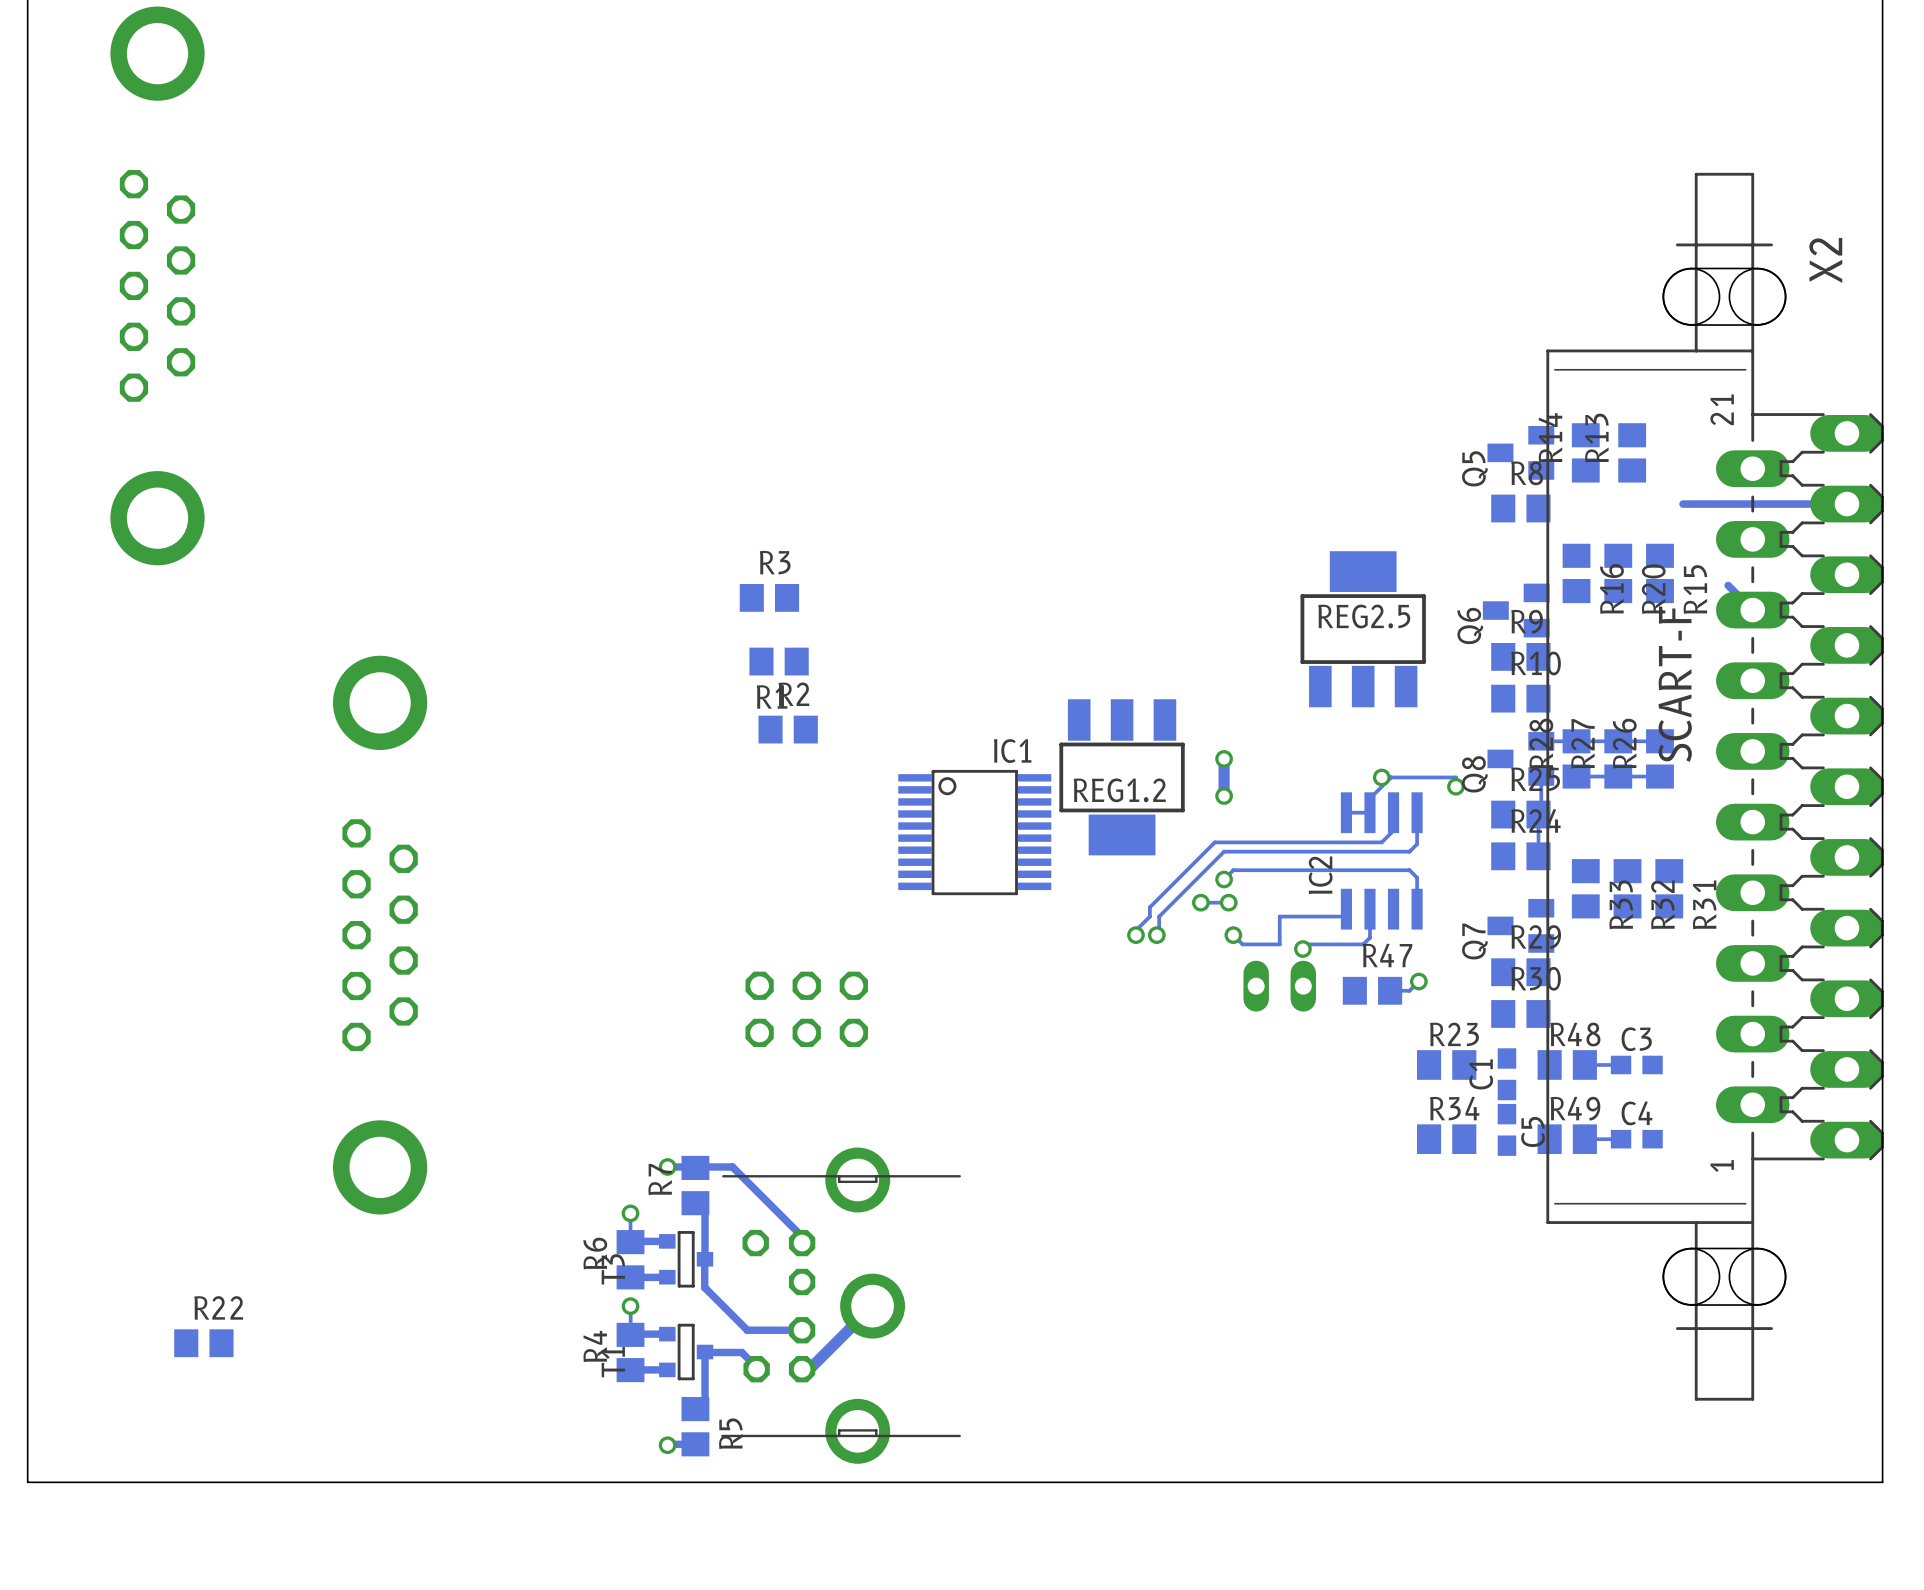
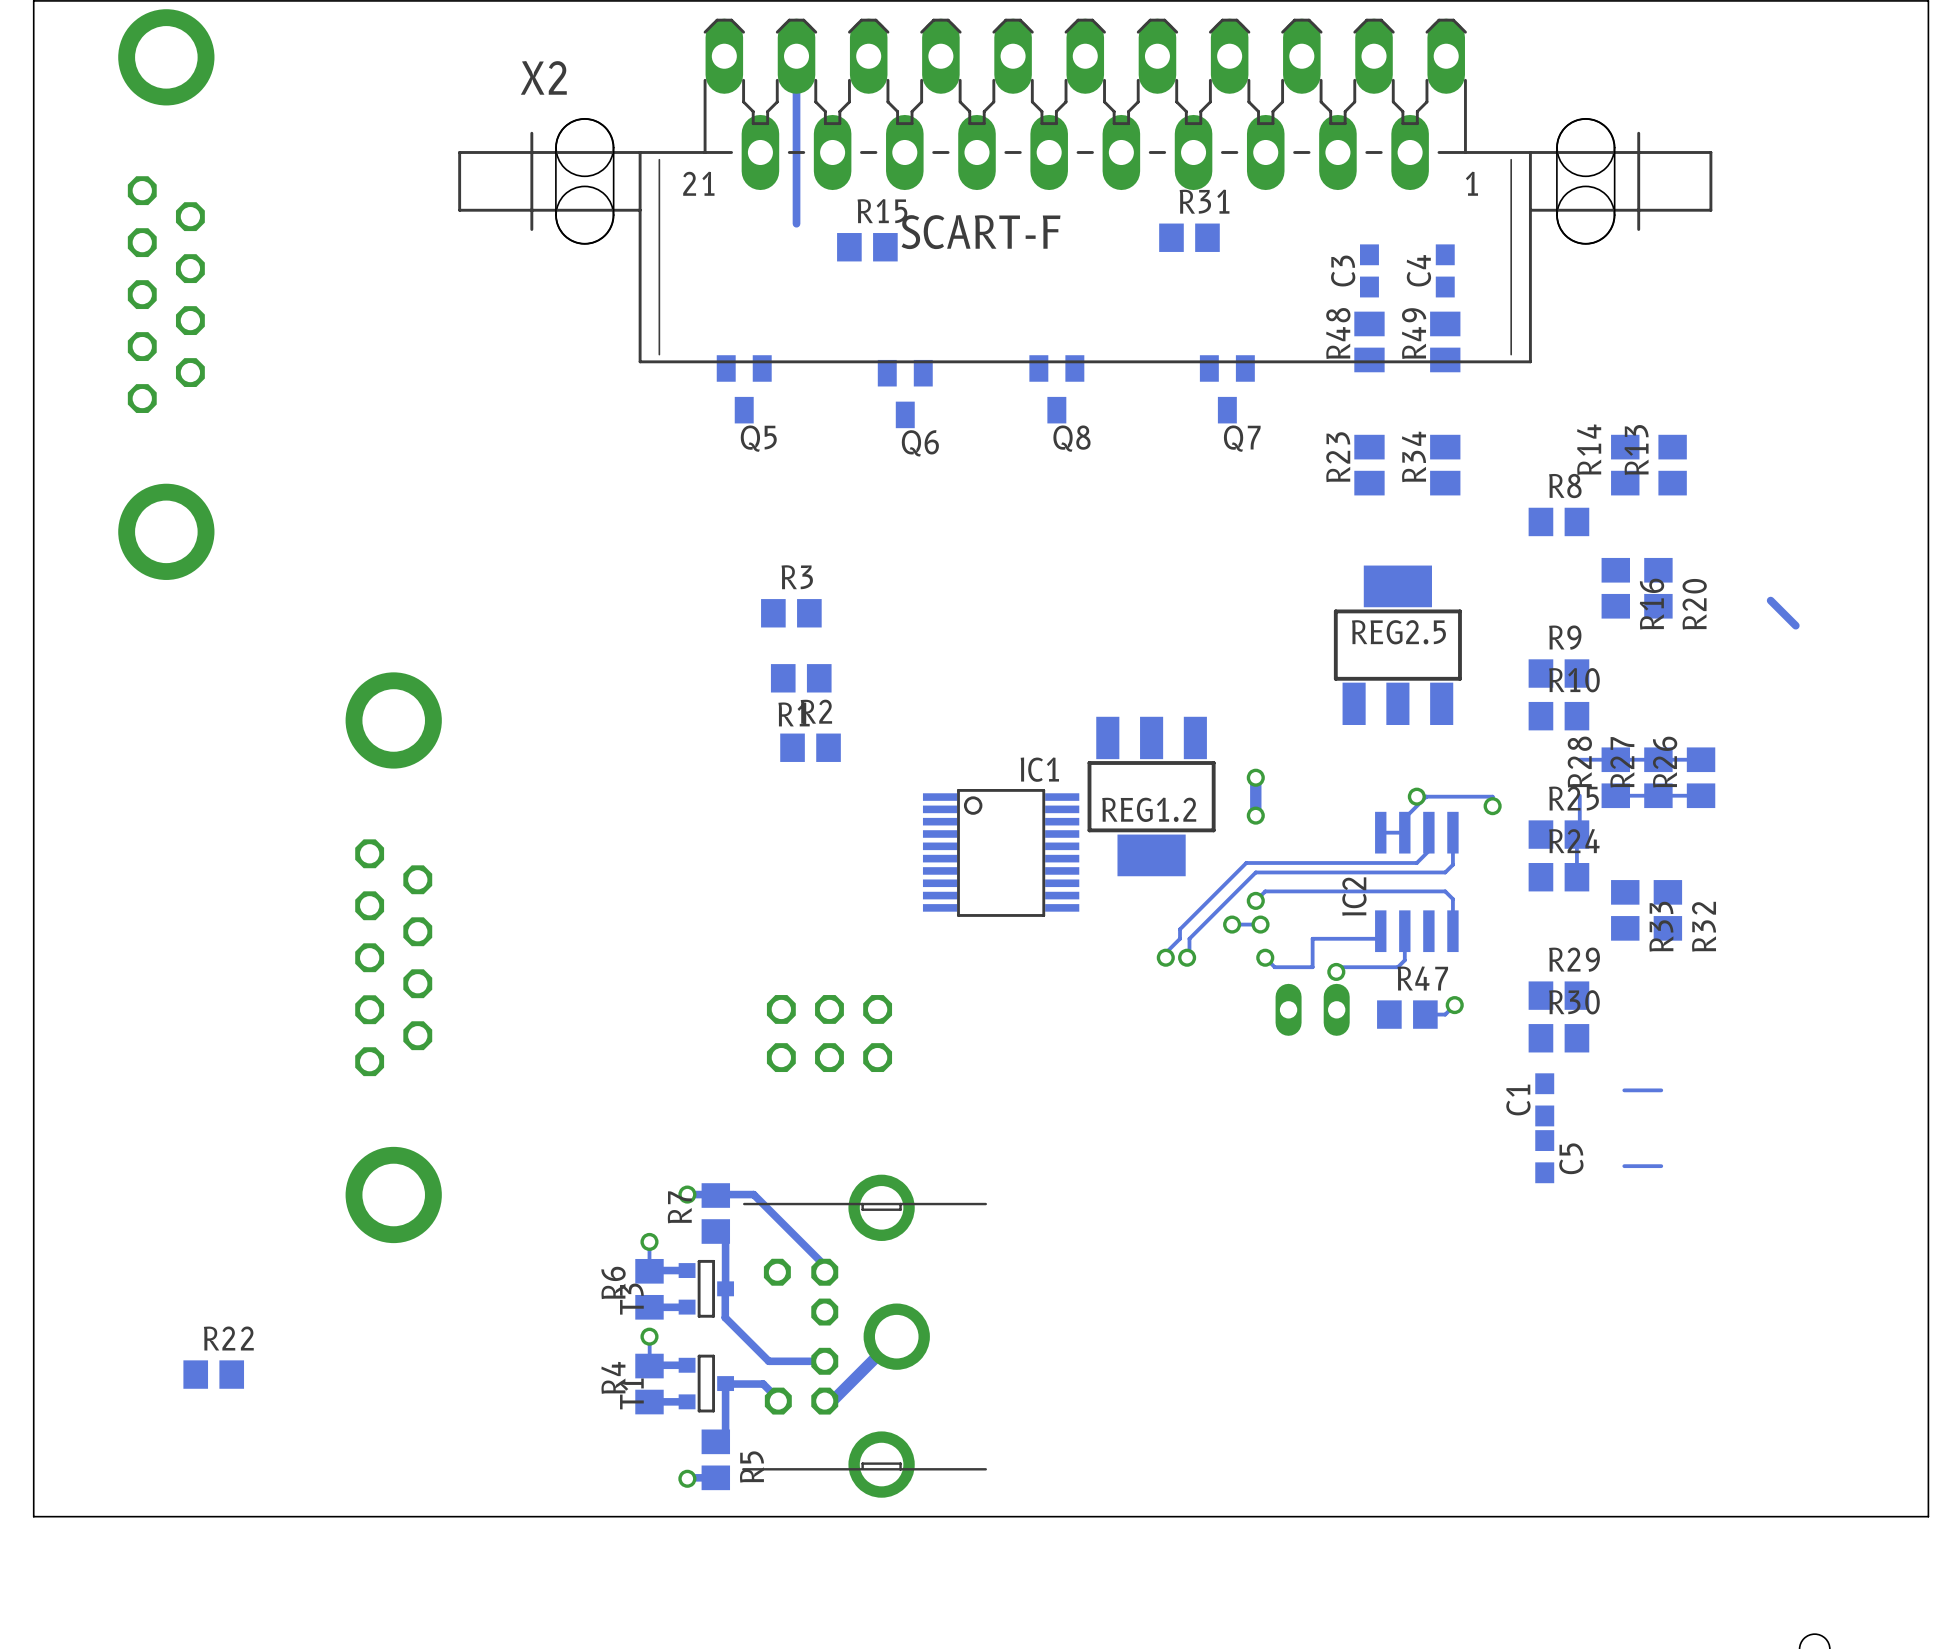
track: none -> (796, 56) (796, 223)
X2 footprint: [1546, 172, 1884, 1401] -> [458, 18, 1713, 364]
X2 name position: X2 (1825, 260) -> X2 (543, 77)
Q5 rotation: 0° (1520, 452) -> 90° counterclockwise (744, 389)
Q5 position: (1520, 452) -> (744, 389)
track: (1846, 504) (1682, 504) -> none
R15 rotation: 0° (1659, 573) -> 90° clockwise (867, 247)
R15 position: (1659, 573) -> (867, 247)
R15 name position: R15 (1695, 589) -> R15 (882, 211)
Q6 rotation: 0° (1516, 610) -> 90° counterclockwise (905, 394)
Q6 position: (1516, 610) -> (905, 394)
Q8 rotation: 0° (1520, 758) -> 90° counterclockwise (1056, 389)
Q8 position: (1520, 758) -> (1056, 389)
R31 rotation: 0° (1669, 888) -> 90° clockwise (1189, 237)
R31 position: (1669, 888) -> (1189, 237)
R31 name position: R31 (1704, 904) -> R31 (1204, 201)
Q7 rotation: 0° (1520, 925) -> 90° counterclockwise (1227, 389)
Q7 position: (1520, 925) -> (1227, 389)
R23 name position: R23 (1454, 1034) -> R23 (1338, 457)
R48 name position: R48 (1575, 1034) -> R48 (1338, 333)
C3 name position: C3 (1636, 1039) -> C3 (1343, 271)
R23 rotation: 0° (1446, 1064) -> 90° clockwise (1369, 465)
R23 position: (1446, 1064) -> (1369, 465)
R48 rotation: 0° (1567, 1064) -> 90° clockwise (1369, 341)
R48 position: (1567, 1064) -> (1369, 341)
C3 rotation: 0° (1636, 1064) -> 90° clockwise (1369, 270)
C3 position: (1636, 1064) -> (1369, 270)
R34 name position: R34 (1454, 1108) -> R34 (1413, 456)
R49 name position: R49 (1575, 1108) -> R49 (1414, 333)
C4 name position: C4 (1636, 1113) -> C4 (1418, 270)
R34 rotation: 0° (1446, 1139) -> 90° clockwise (1445, 465)
R34 position: (1446, 1139) -> (1445, 465)
R49 rotation: 0° (1567, 1139) -> 90° clockwise (1445, 341)
R49 position: (1567, 1139) -> (1445, 341)
C4 rotation: 0° (1636, 1139) -> 90° clockwise (1445, 270)
C4 position: (1636, 1139) -> (1445, 270)

